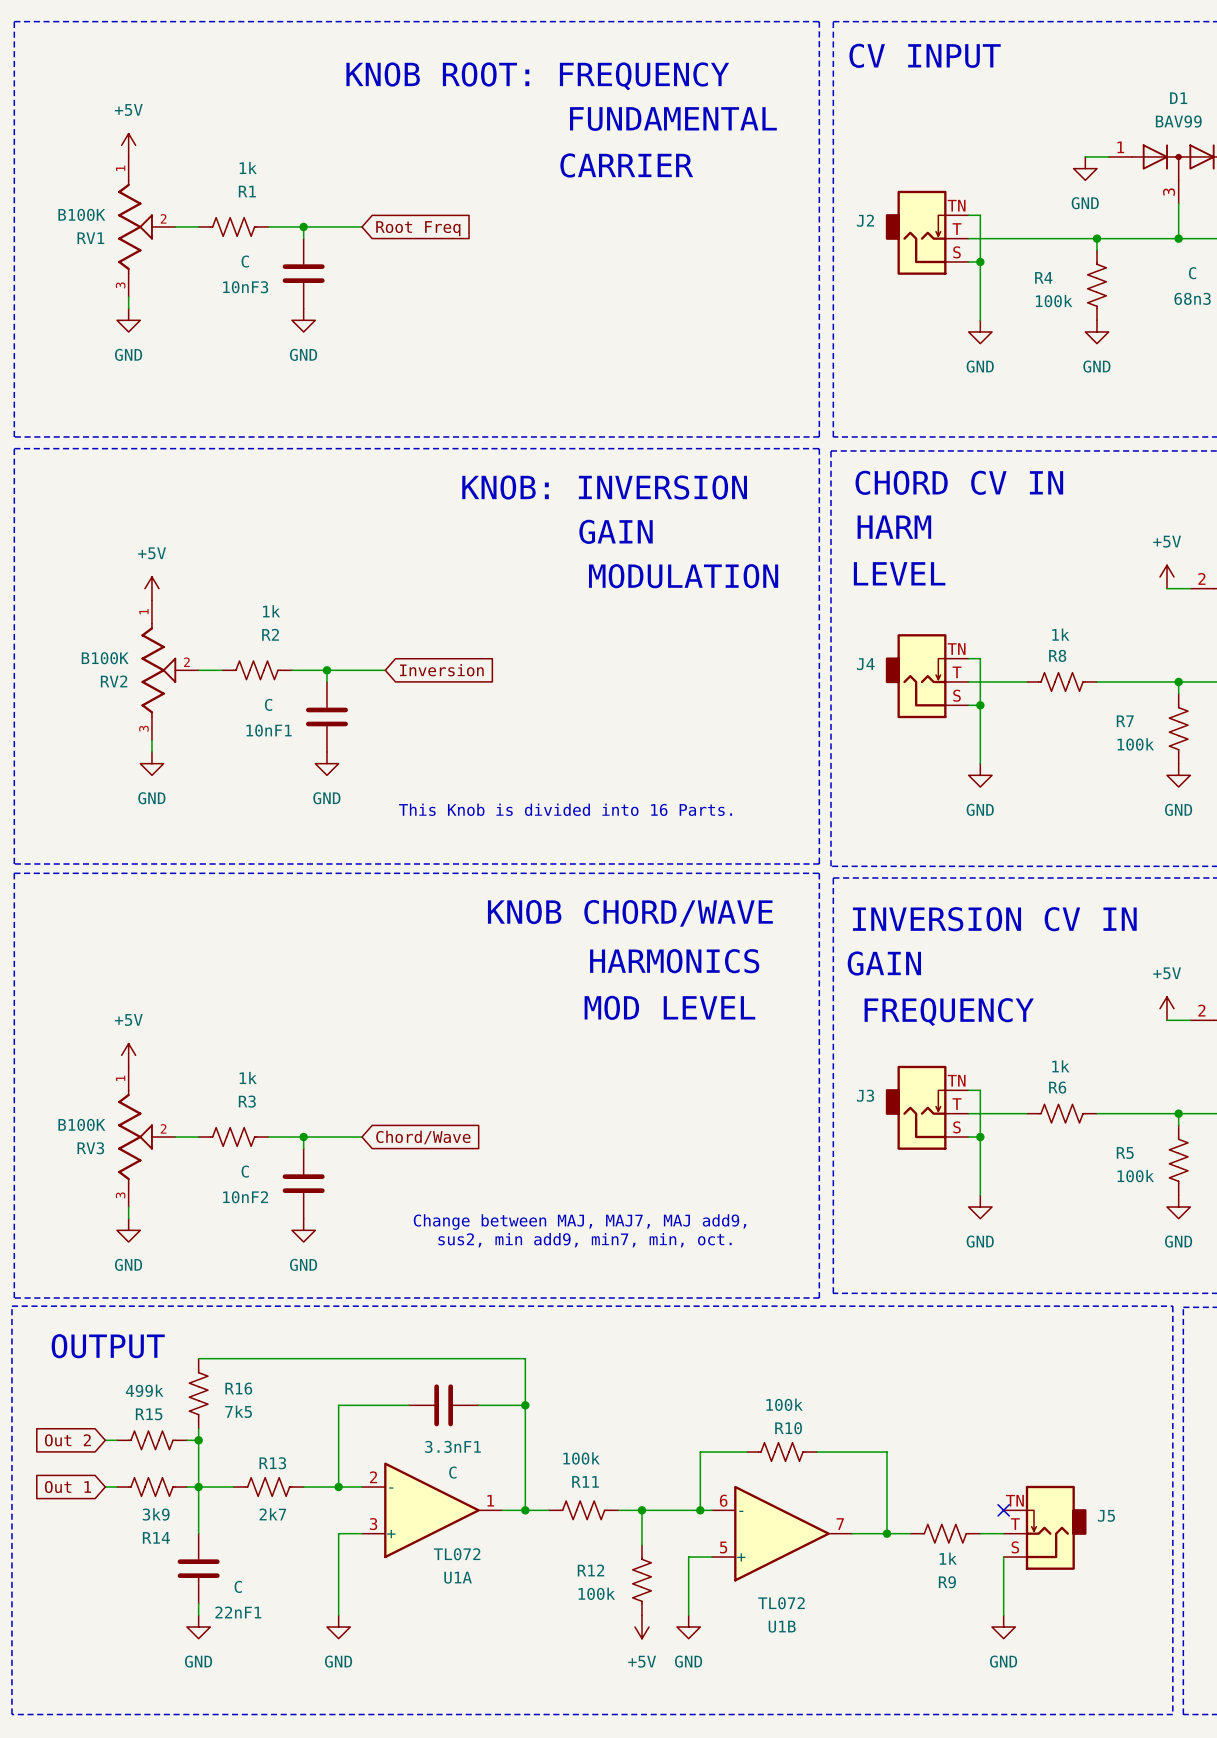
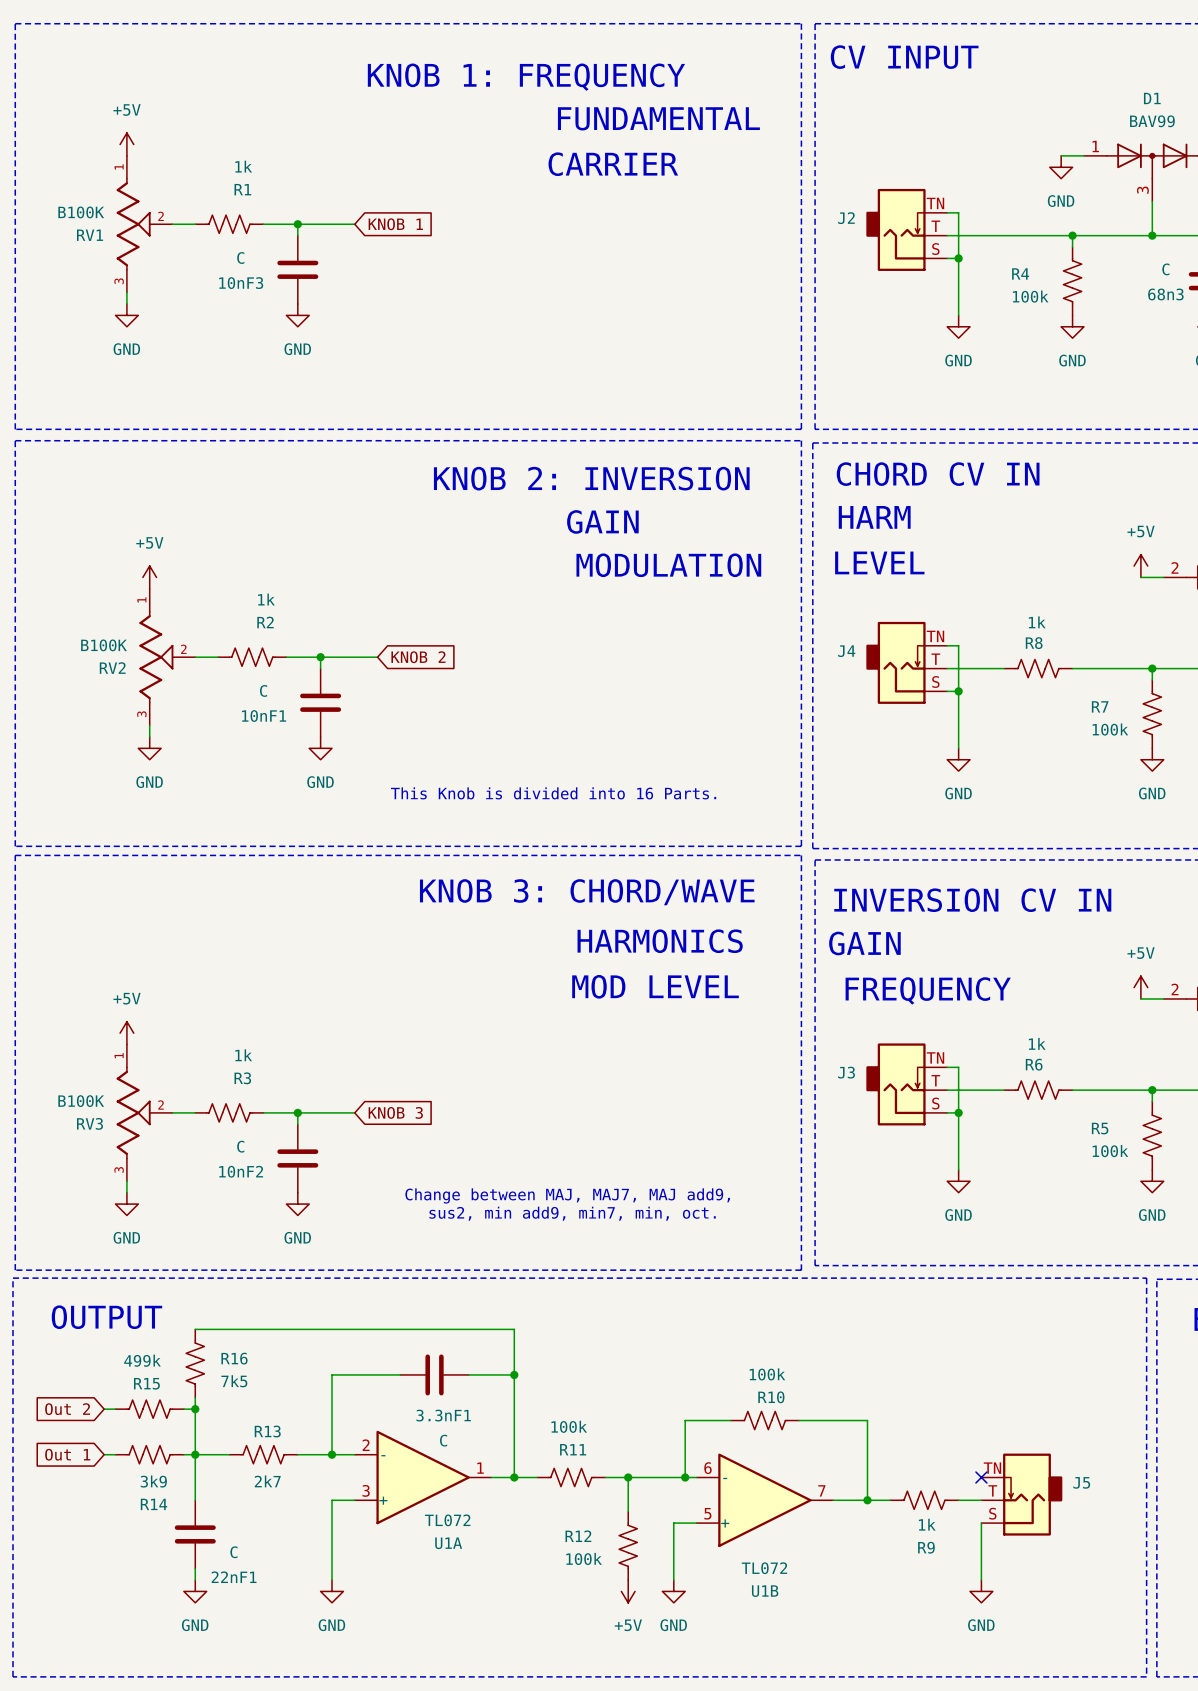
text: KNOB ROOT: FREQUENCY (537, 76) -> KNOB 1: FREQUENCY (526, 77)
global label: Root Freq (418, 228) -> KNOB 1 (395, 224)
text: KNOB: INVERSION (604, 487) -> KNOB 2: INVERSION (591, 478)
global label: Inversion (441, 670) -> KNOB 2 (418, 657)
text: KNOB CHORD/WAVE (630, 913) -> KNOB 3: CHORD/WAVE (587, 892)
global label: Chord/Wave (423, 1137) -> KNOB 3 (395, 1112)

